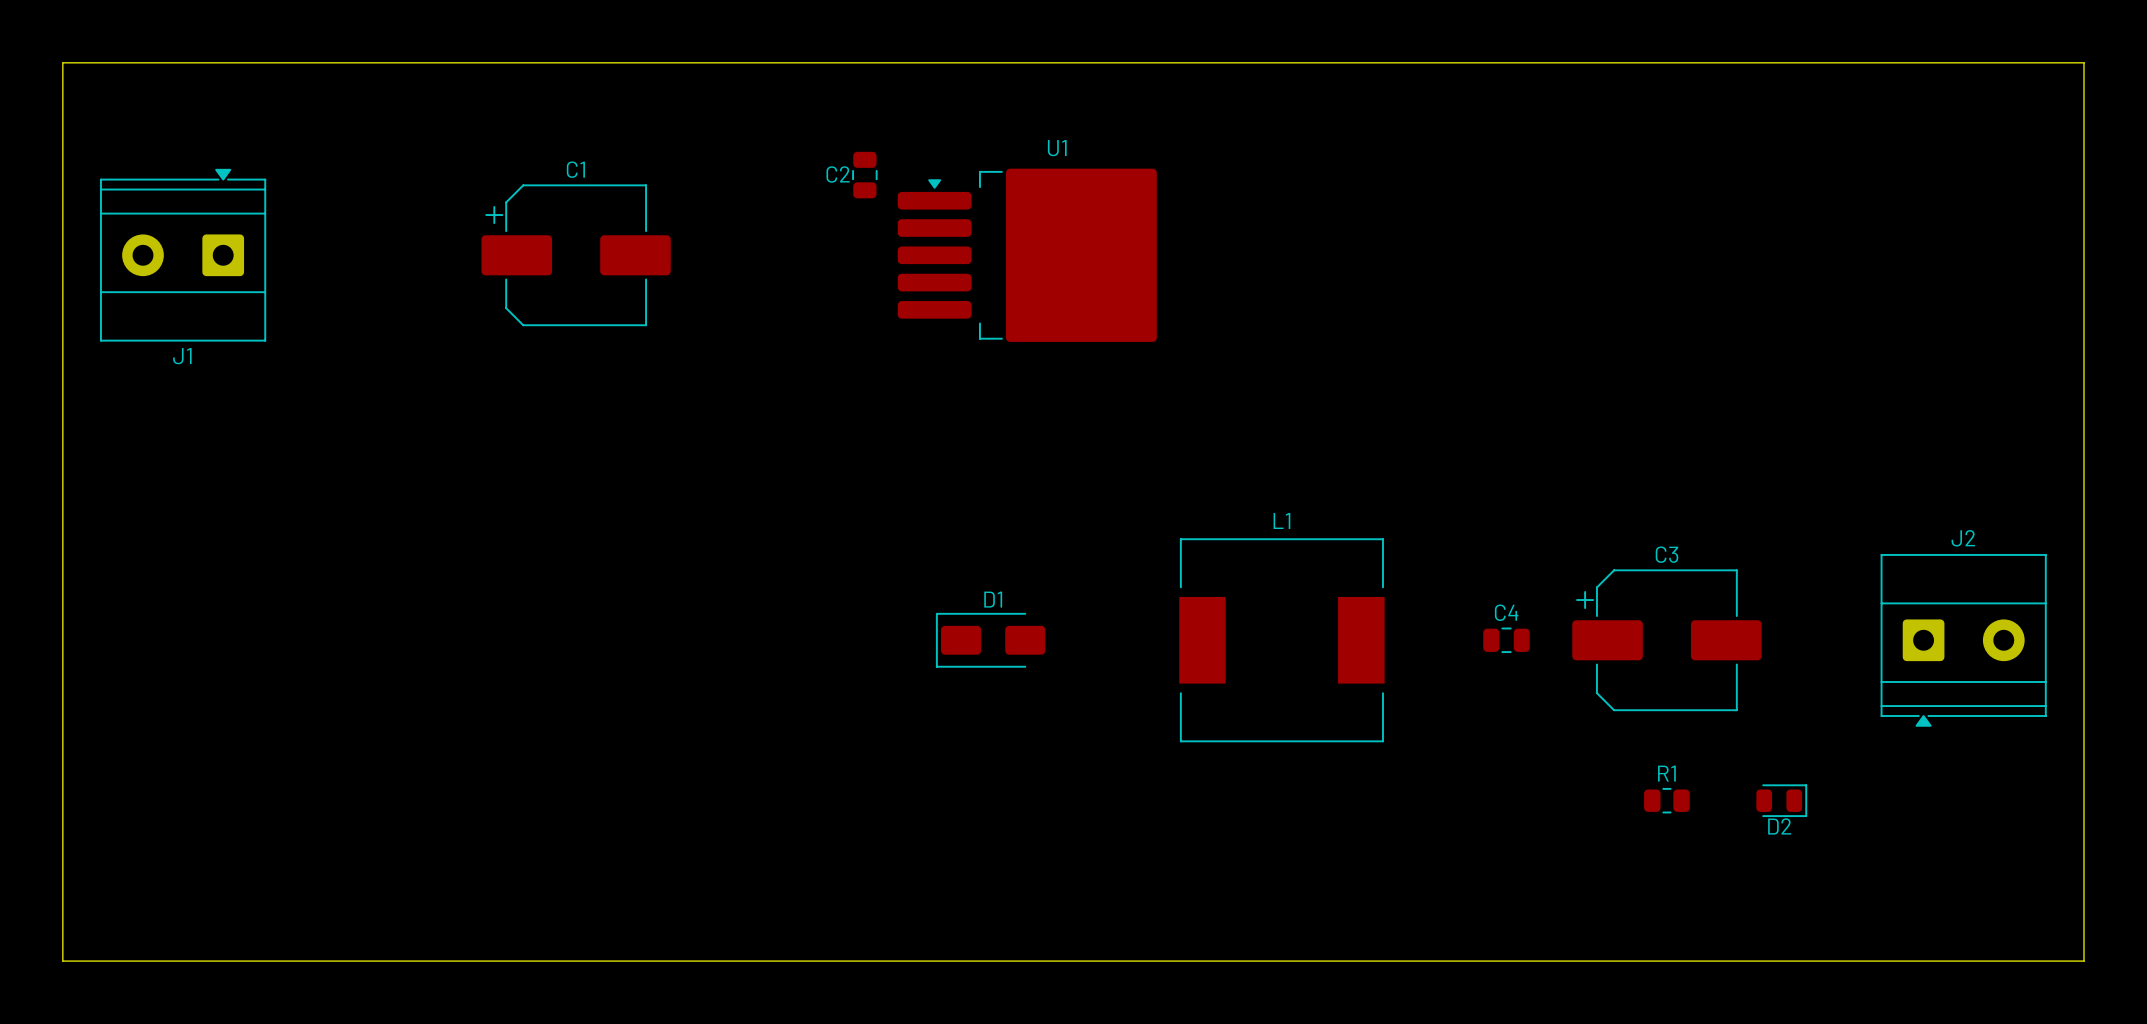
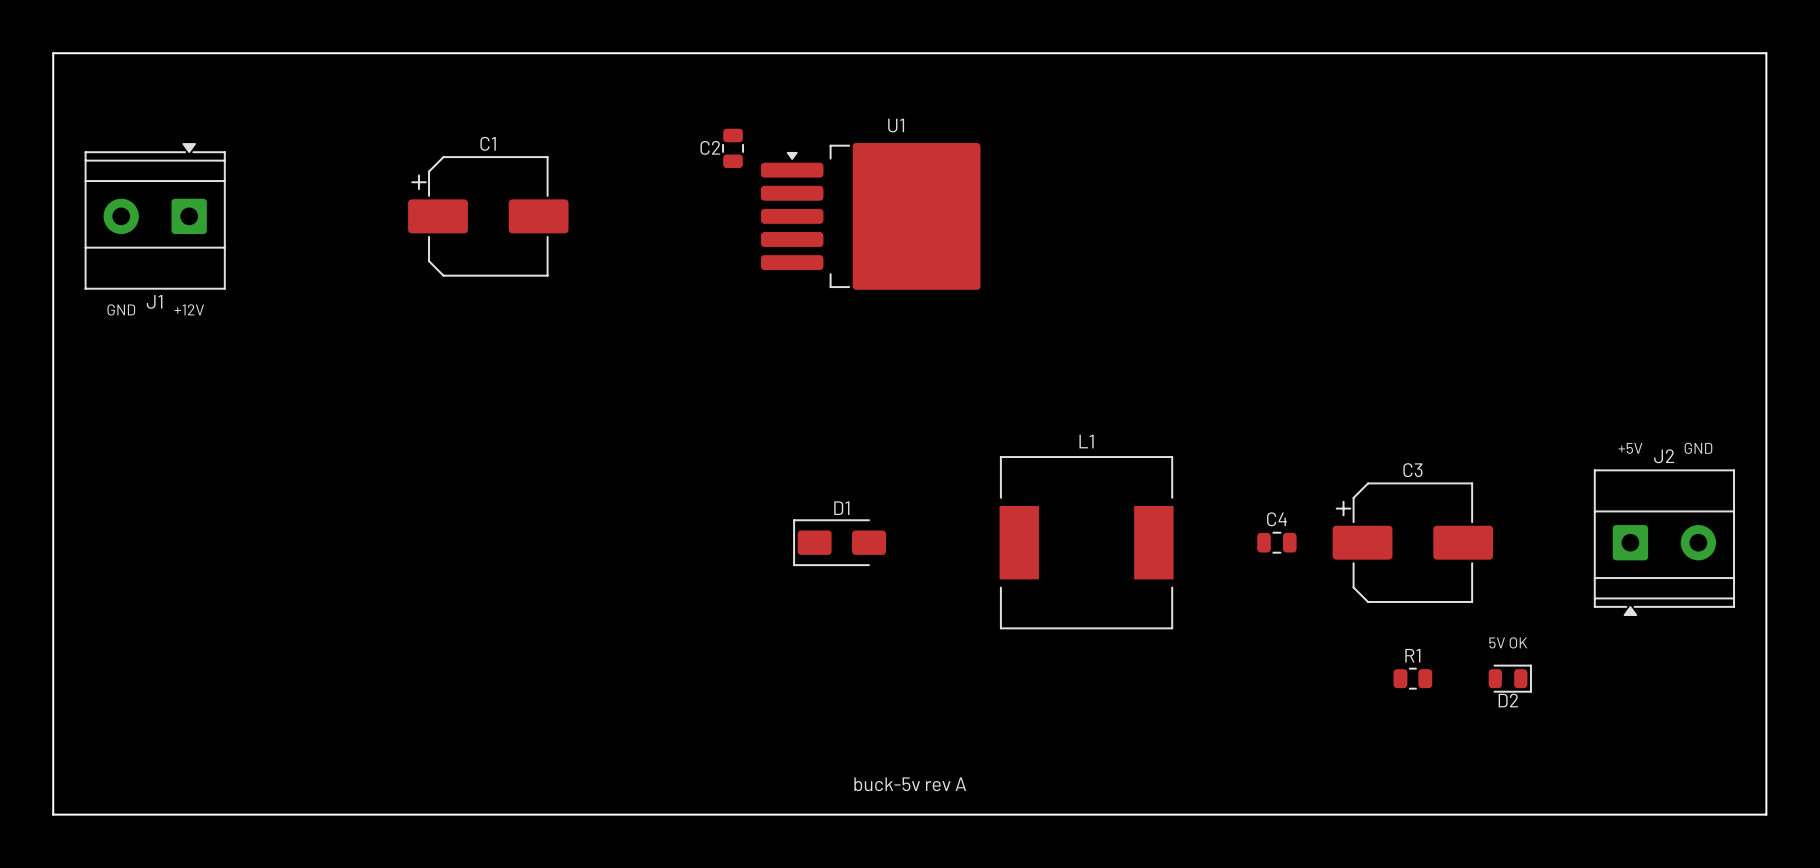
text: none -> GND (121, 309)
text: none -> +12V (189, 309)
text: none -> GND (1698, 448)
text: none -> +5V (1630, 448)
text: none -> 5V OK (1508, 642)
text: none -> buck-5v rev A (910, 784)

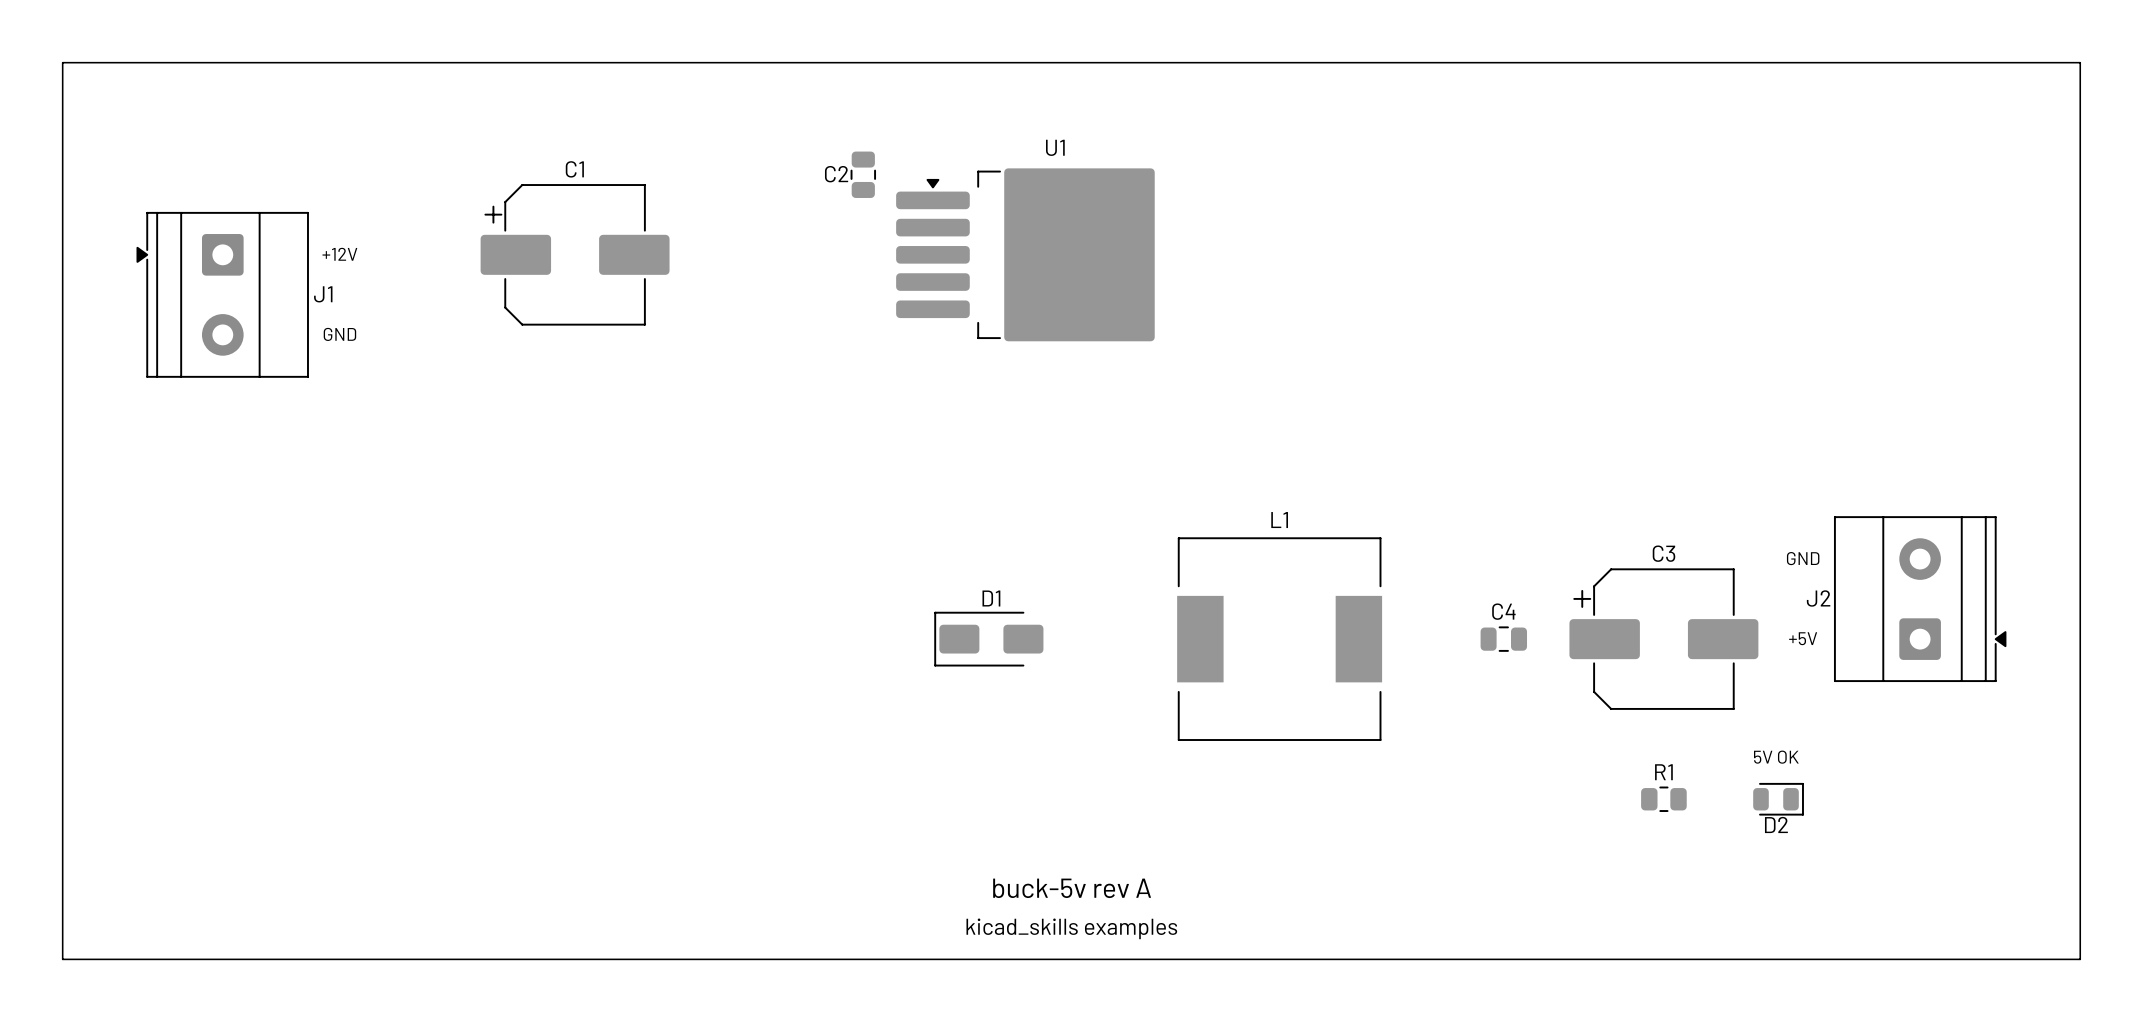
J1 rotation: 0° (155, 216) -> 90° counterclockwise (222, 294)
text position: GND (121, 309) -> GND (339, 334)
text position: +12V (189, 309) -> +12V (339, 254)
text position: +5V (1630, 448) -> +5V (1803, 638)
text position: GND (1698, 448) -> GND (1803, 558)
J2 rotation: 0° (1664, 542) -> 90° counterclockwise (1920, 599)
text: none -> buck-5v rev A (1072, 888)
text: buck-5v rev A (910, 784) -> kicad_skills examples (1071, 928)

